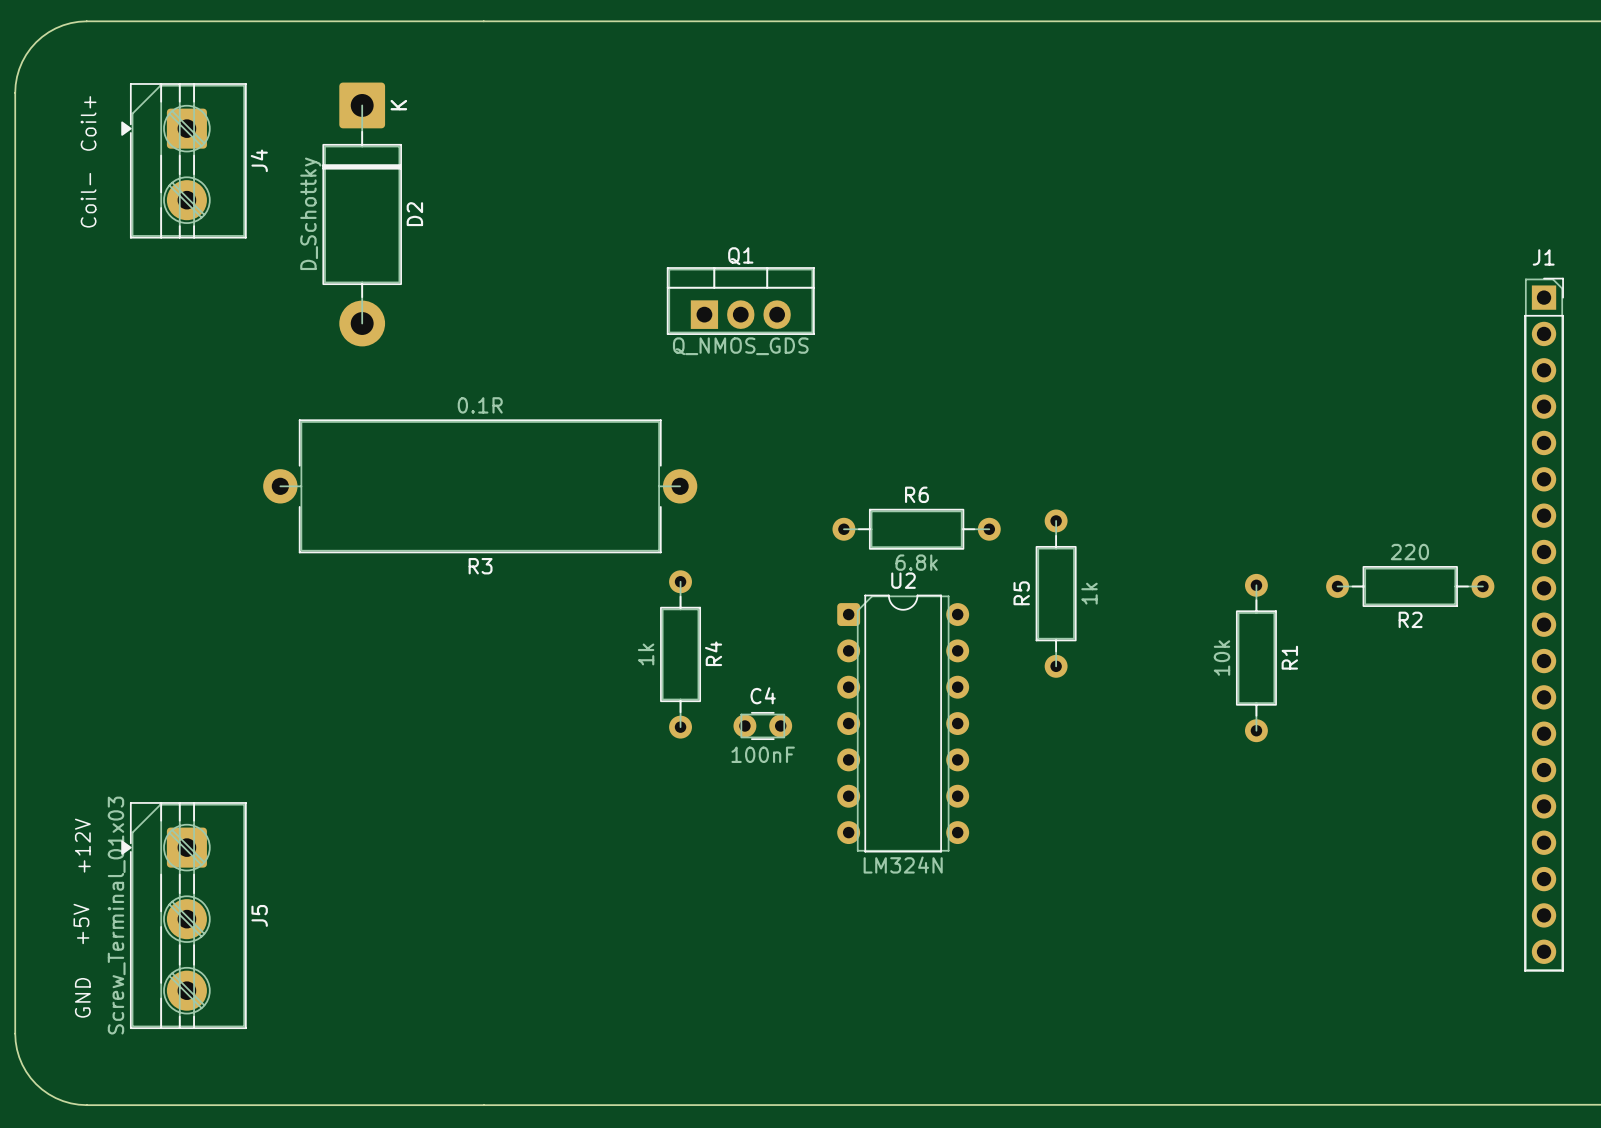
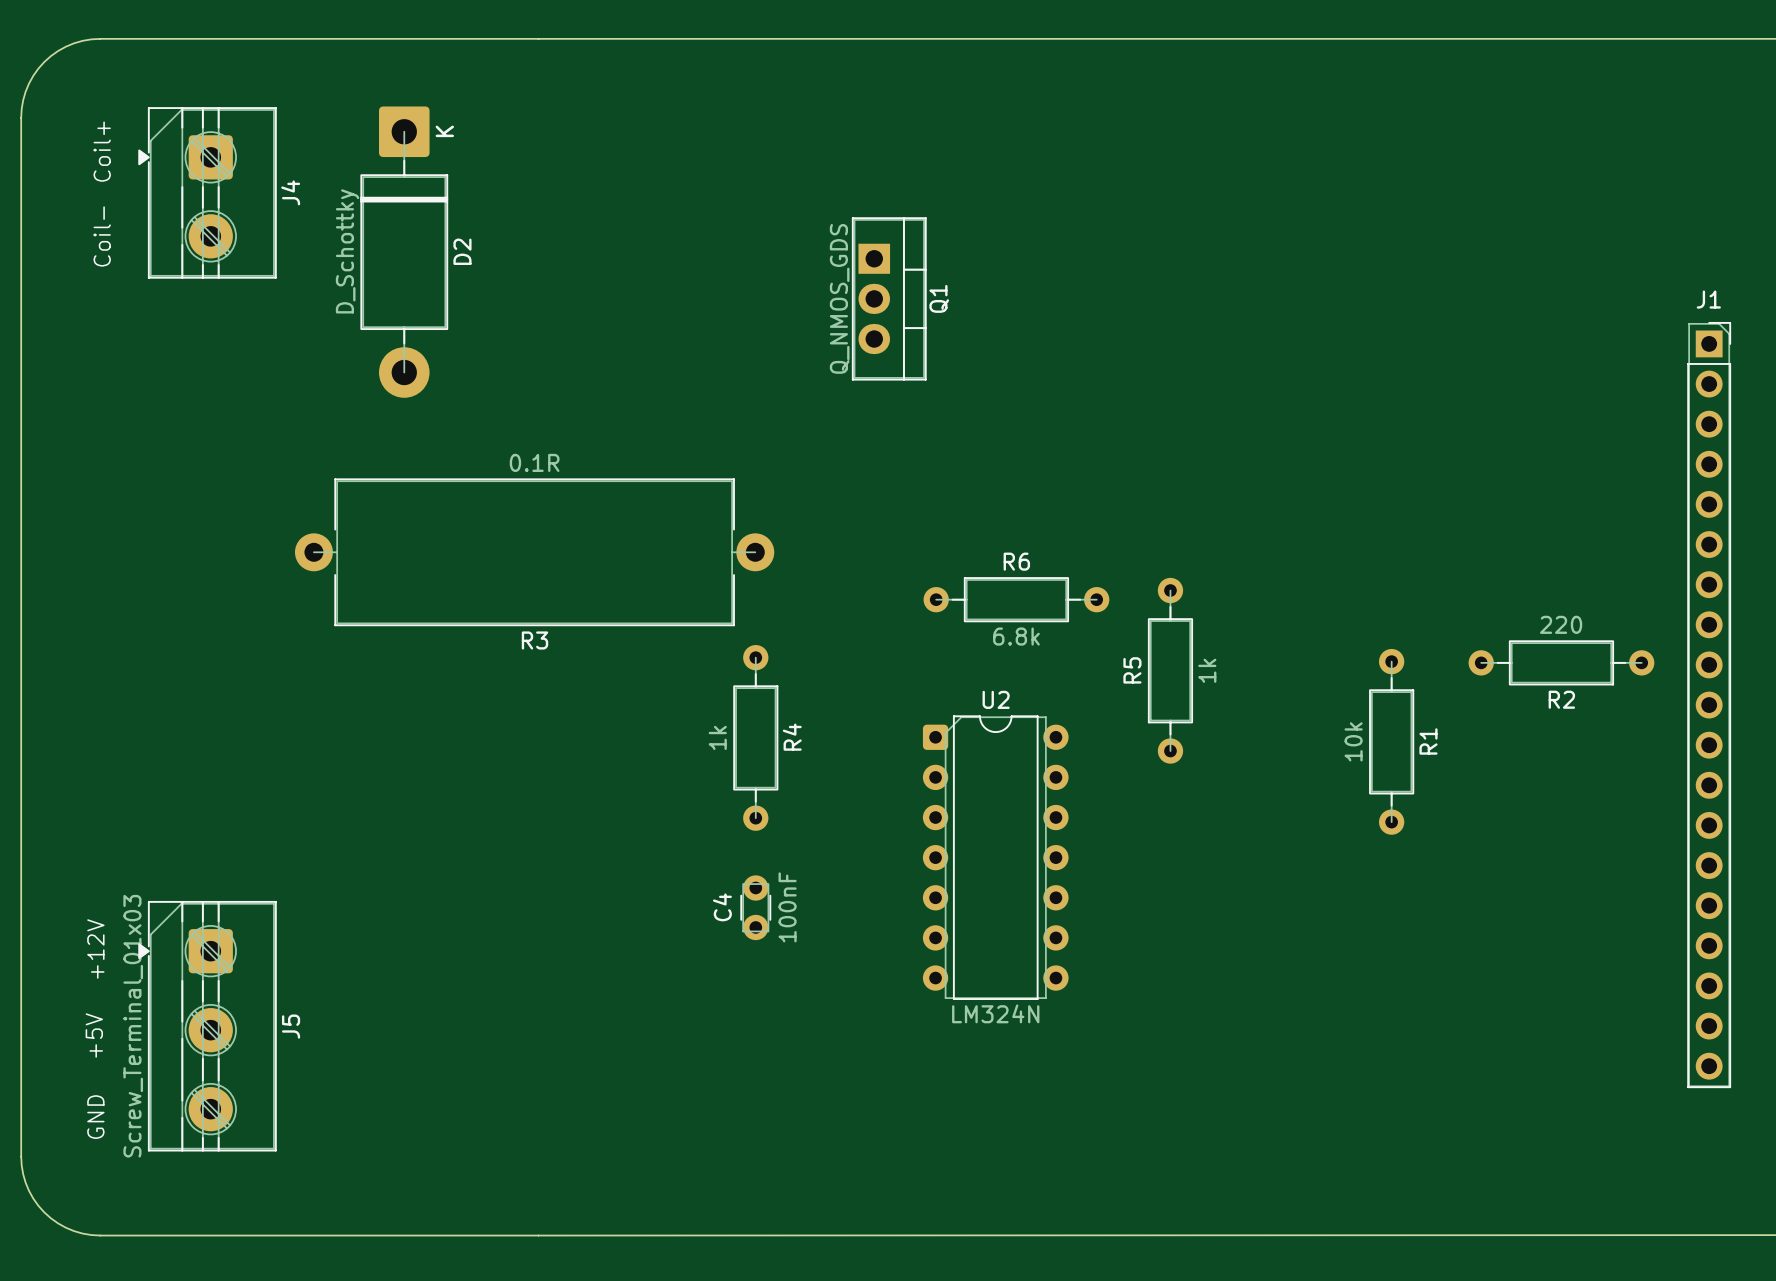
Q1 rotation: 0° (740, 301) -> 90° clockwise (889, 298)
C4 name position: C4 (763, 695) -> C4 (722, 907)
U2 position: (903, 723) -> (995, 857)
C4 rotation: 0° (762, 725) -> 90° clockwise (755, 907)
C4 position: (762, 725) -> (755, 907)
C4 value position: 100nF (763, 754) -> 100nF (787, 907)

